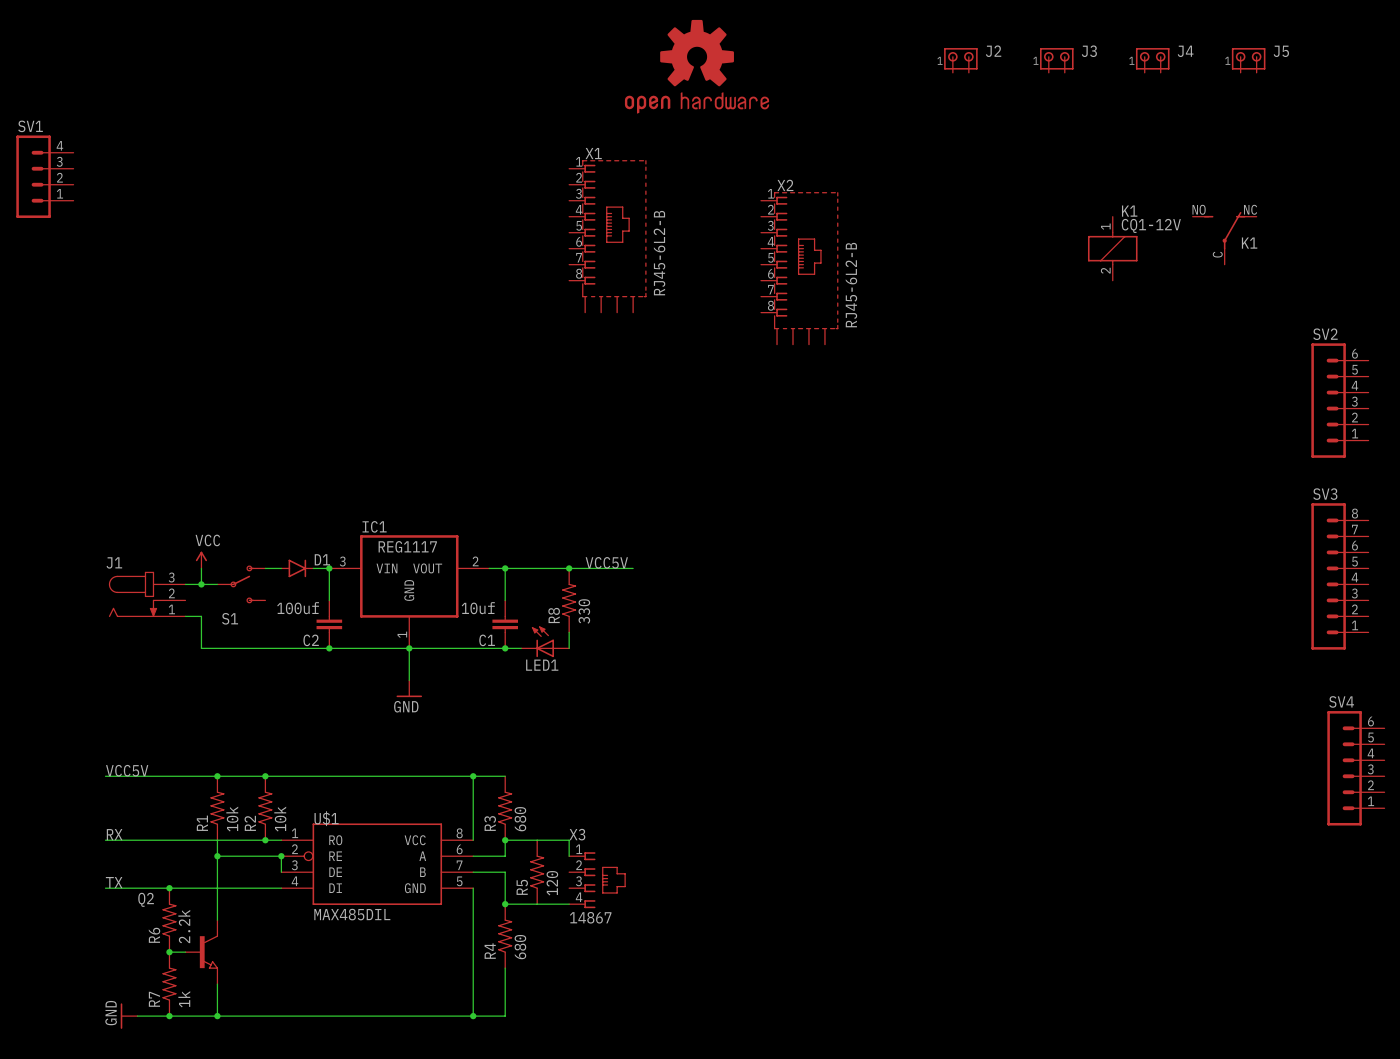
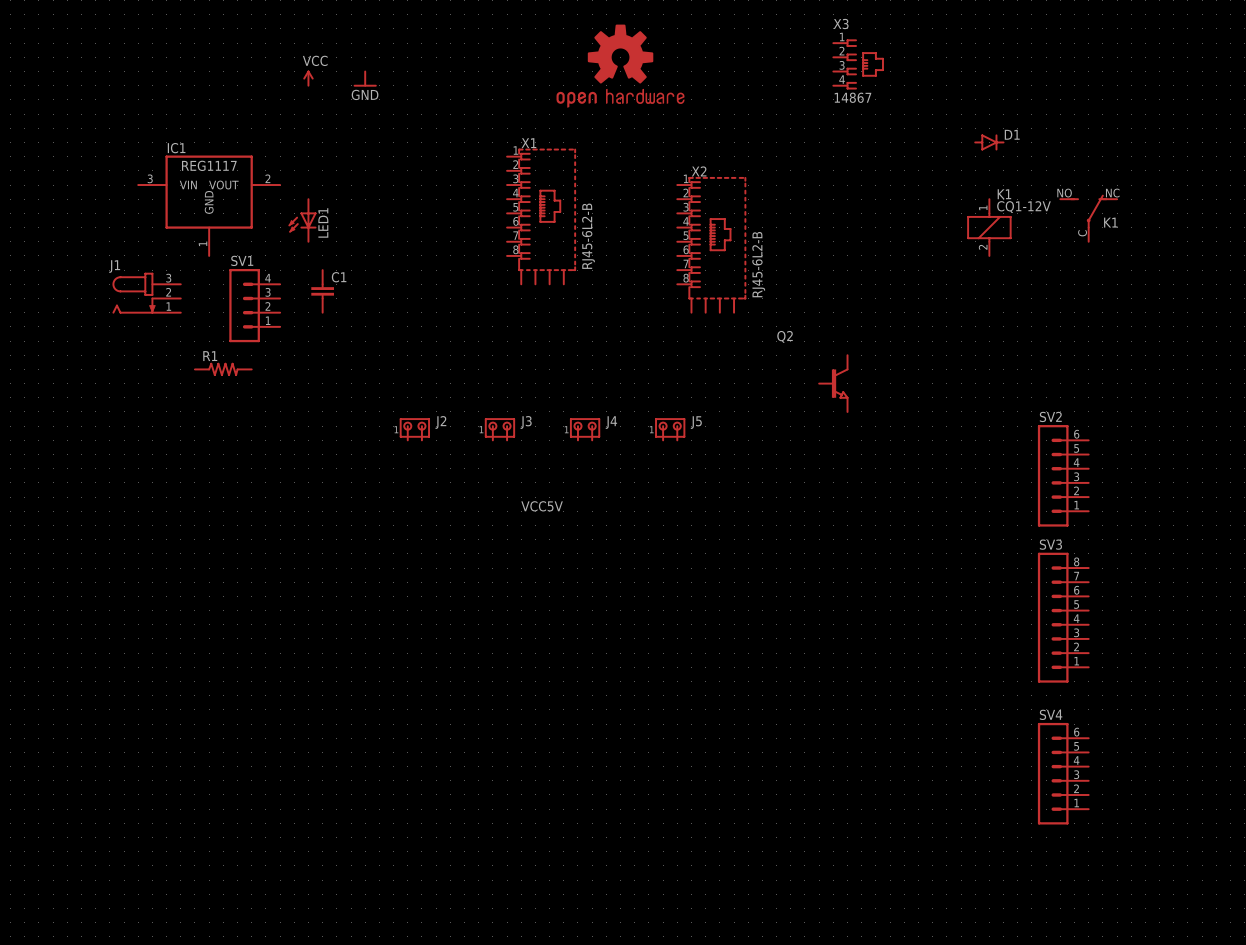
J2 position: (960, 60) -> (414, 429)
J3 position: (1056, 60) -> (499, 429)
J4 position: (1152, 60) -> (585, 429)
J5 position: (1248, 60) -> (670, 429)
power symbol: none -> VCC (308, 78)
power symbol: none -> GND (365, 78)
SV1 position: (44, 176) -> (254, 305)
SV2 position: (1339, 400) -> (1063, 475)
power symbol: VCC (201, 560) -> none
wire: (201, 568) (201, 584) -> none
wire: (265, 568) (281, 568) -> none
D1 position: (297, 568) -> (989, 142)
wire: (313, 568) (329, 568) (329, 600) -> none
junction: (329, 568) -> none
wire: (489, 568) (633, 568) -> none
wire: (505, 568) (505, 600) -> none
junction: (505, 568) -> none
junction: (569, 568) -> none
SV3 position: (1339, 576) -> (1063, 617)
wire: (185, 584) (217, 584) -> none
junction: (201, 584) -> none
S1: (241, 584) -> none
IC1 position: (409, 591) -> (209, 205)
J1 position: (147, 594) -> (146, 293)
R8: 330 (569, 600) -> none
C1 value: 10uf (478, 608) -> none
wire: (185, 616) (201, 616) (201, 648) (521, 648) -> none
C2: 100uf (329, 624) -> none
C1 position: (505, 624) -> (322, 291)
wire: (569, 632) (569, 648) -> none
C1 name position: C1 (487, 640) -> C1 (339, 277)
LED1 rotation: 0° (542, 641) -> 90° counterclockwise (302, 222)
LED1 position: (545, 641) -> (302, 220)
junction: (329, 648) -> none
wire: (409, 648) (409, 680) -> none
junction: (409, 648) -> none
junction: (505, 648) -> none
power symbol: GND (409, 688) -> none
SV4 position: (1355, 768) -> (1063, 773)
label: VCC5V (127, 770) -> none
wire: (105, 776) (505, 776) -> none
junction: (217, 776) -> none
junction: (265, 776) -> none
wire: (473, 776) (473, 840) -> none
junction: (473, 776) -> none
R1 rotation: 0° (217, 808) -> 90° clockwise (223, 369)
R1 position: (217, 808) -> (223, 369)
R2: 10k (265, 808) -> none
R3: 680 (505, 808) -> none
R1 value: 10k (232, 819) -> none
label: RX (114, 834) -> none
wire: (105, 840) (281, 840) -> none
wire: (217, 840) (217, 920) -> none
junction: (265, 840) -> none
junction: (505, 840) -> none
wire: (217, 856) (281, 856) (281, 872) -> none
junction: (217, 856) -> none
junction: (281, 856) -> none
wire: (473, 856) (505, 856) (505, 840) (569, 840) (569, 856) -> none
U$1: MAX485DIL (377, 864) -> none
wire: (473, 872) (505, 872) (505, 904) (569, 904) -> none
R5: 120 (537, 872) -> none
X3 position: (597, 880) -> (858, 64)
label: TX (114, 882) -> none
wire: (105, 888) (281, 888) -> none
junction: (169, 888) -> none
wire: (473, 888) (473, 1016) -> none
junction: (505, 904) -> none
R6: 2.2k (169, 920) -> none
R4: 680 (505, 936) -> none
wire: (169, 952) (185, 952) -> none
junction: (169, 952) -> none
Q2 position: (201, 952) -> (833, 383)
wire: (505, 968) (505, 1016) (137, 1016) -> none
R7: 1k (169, 984) -> none
wire: (217, 984) (217, 1016) -> none
power symbol: GND (129, 1016) -> none
junction: (169, 1016) -> none
junction: (217, 1016) -> none
junction: (473, 1016) -> none

